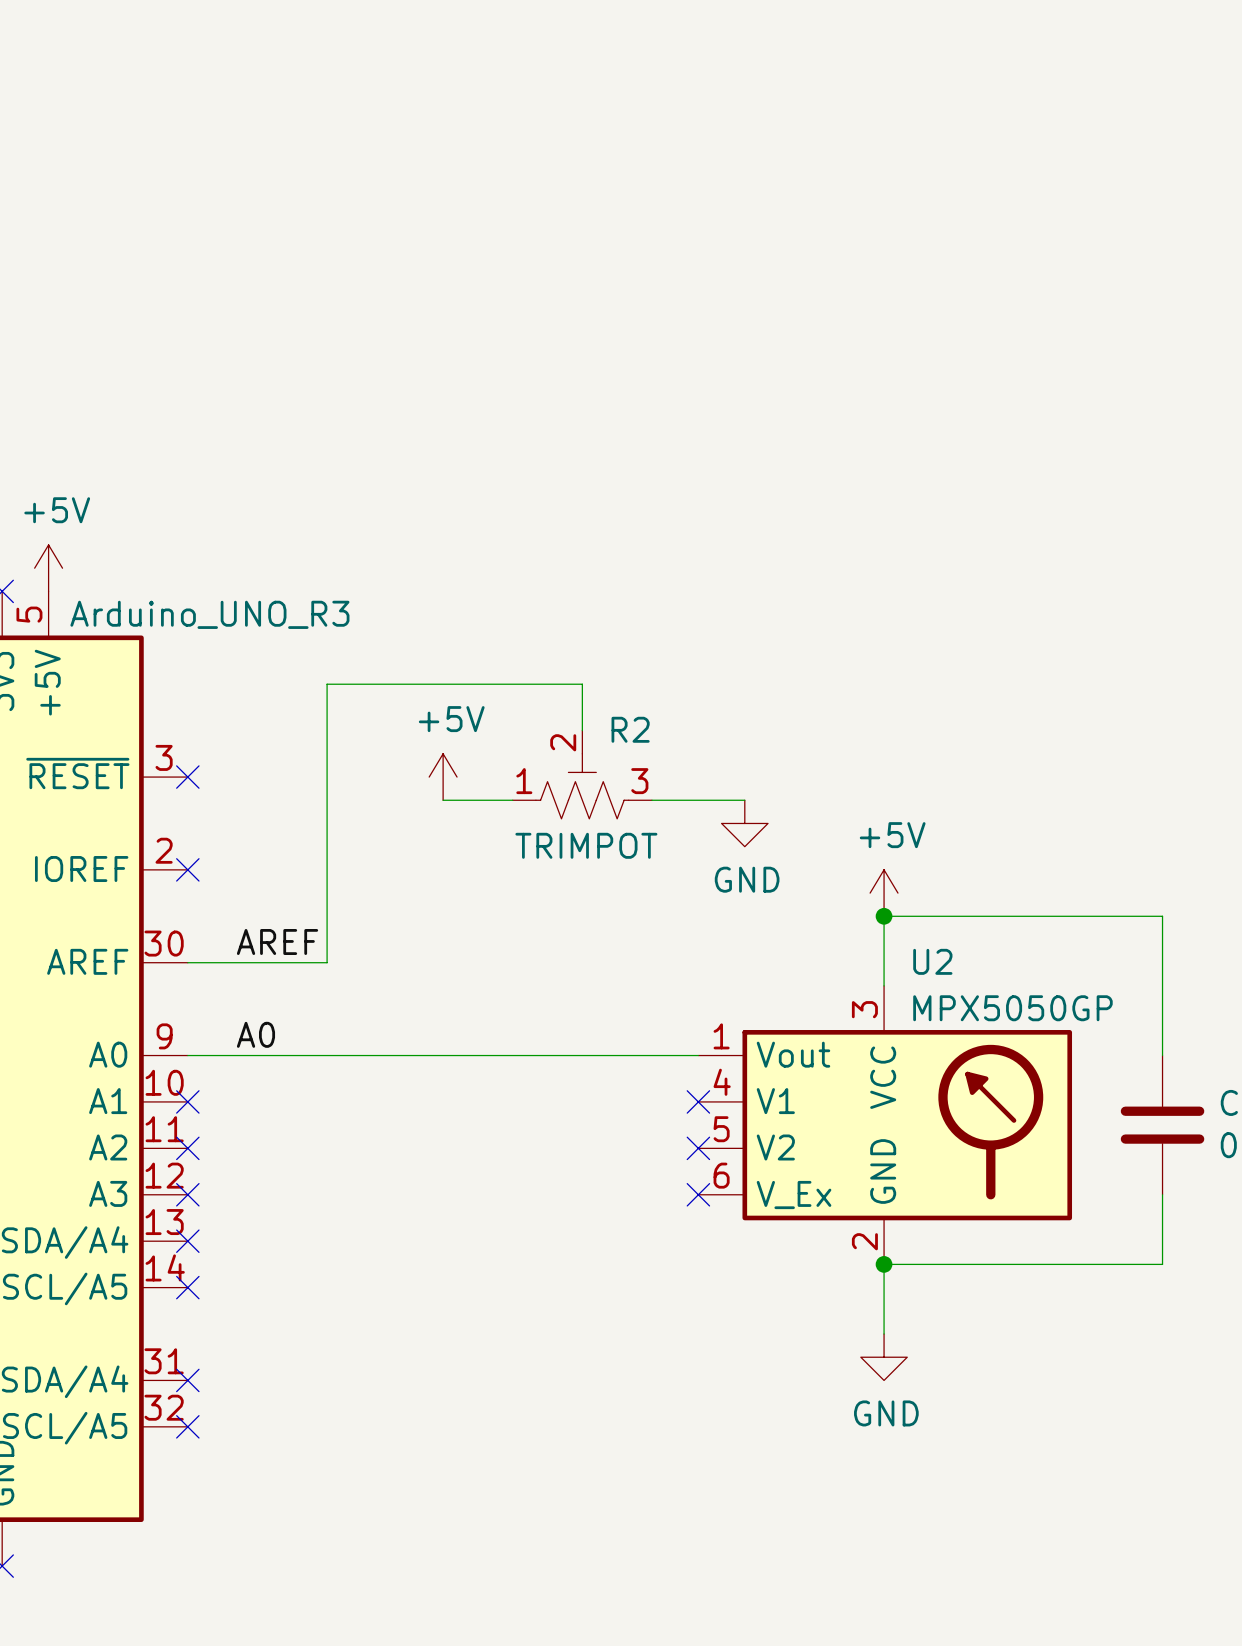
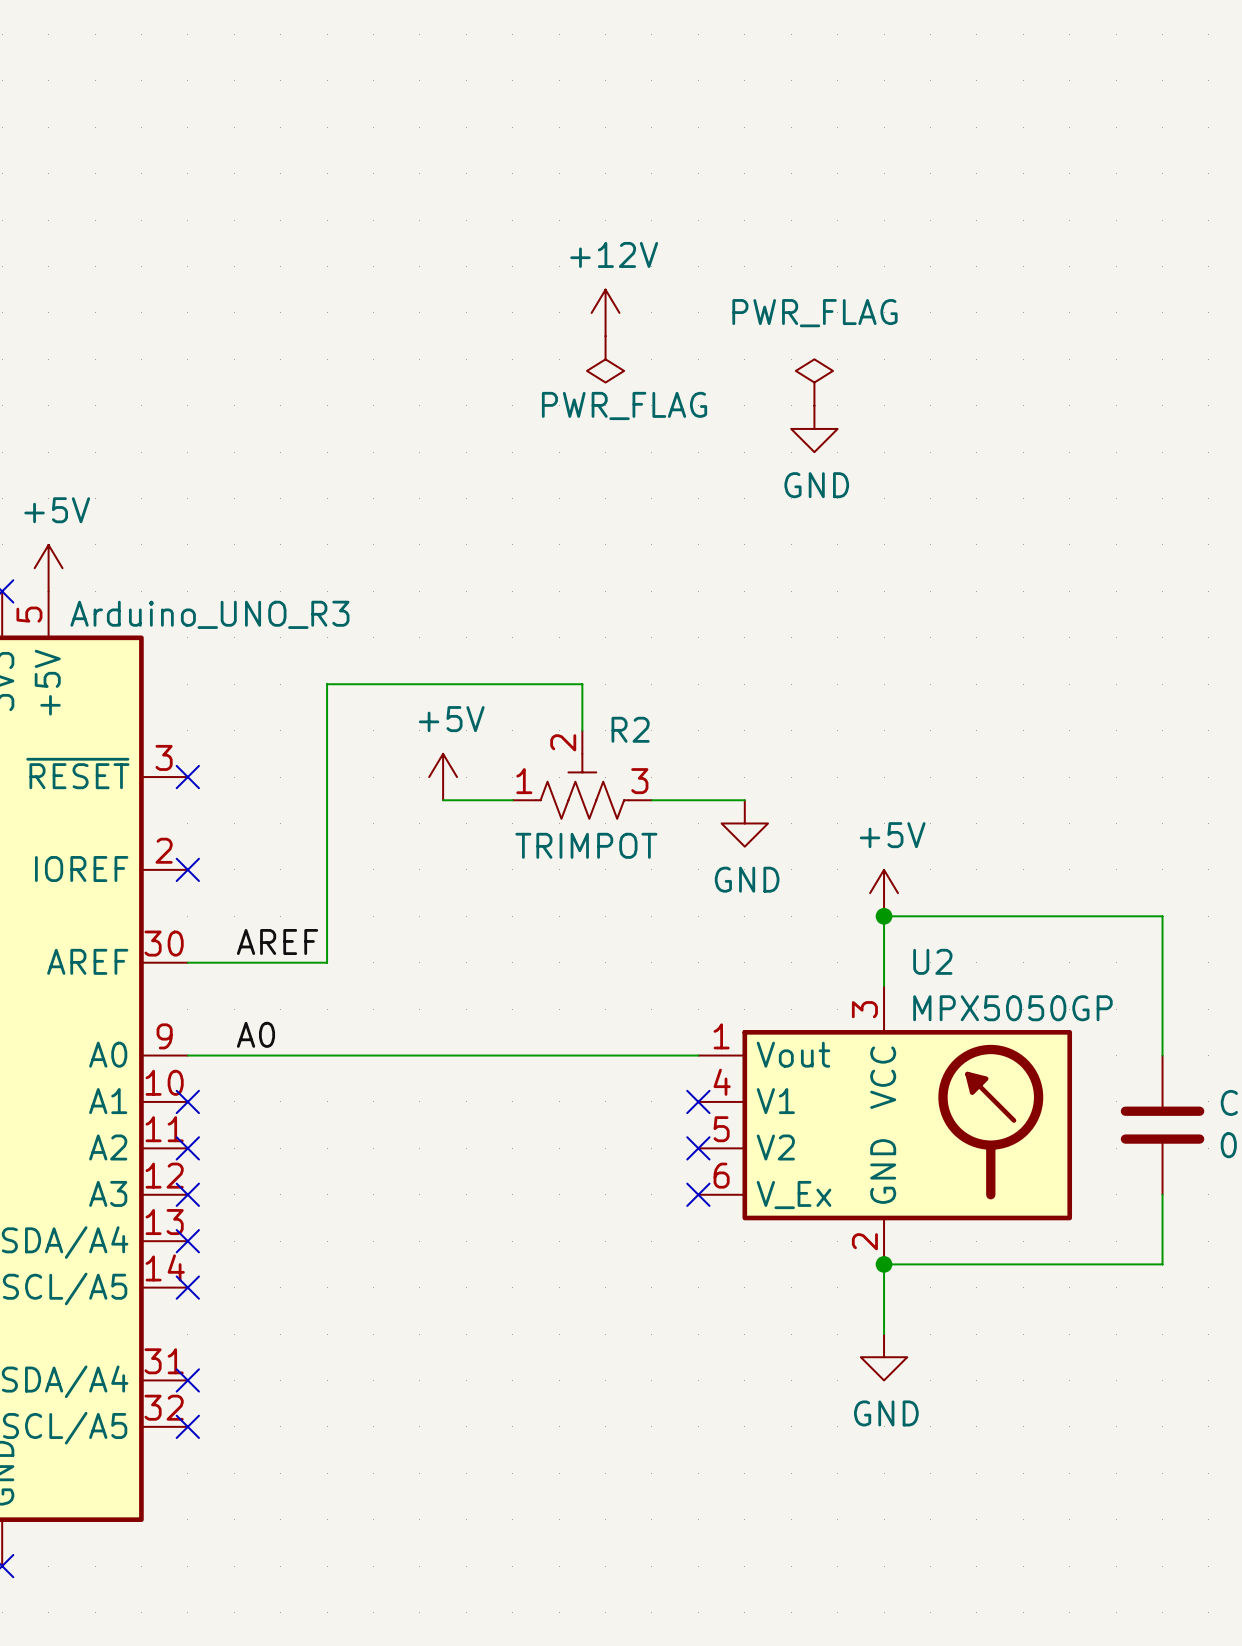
power symbol: none -> +12V (605, 312)
power symbol: none -> PWR_FLAG (605, 359)
power symbol: none -> PWR_FLAG (814, 382)
power symbol: none -> GND (814, 428)

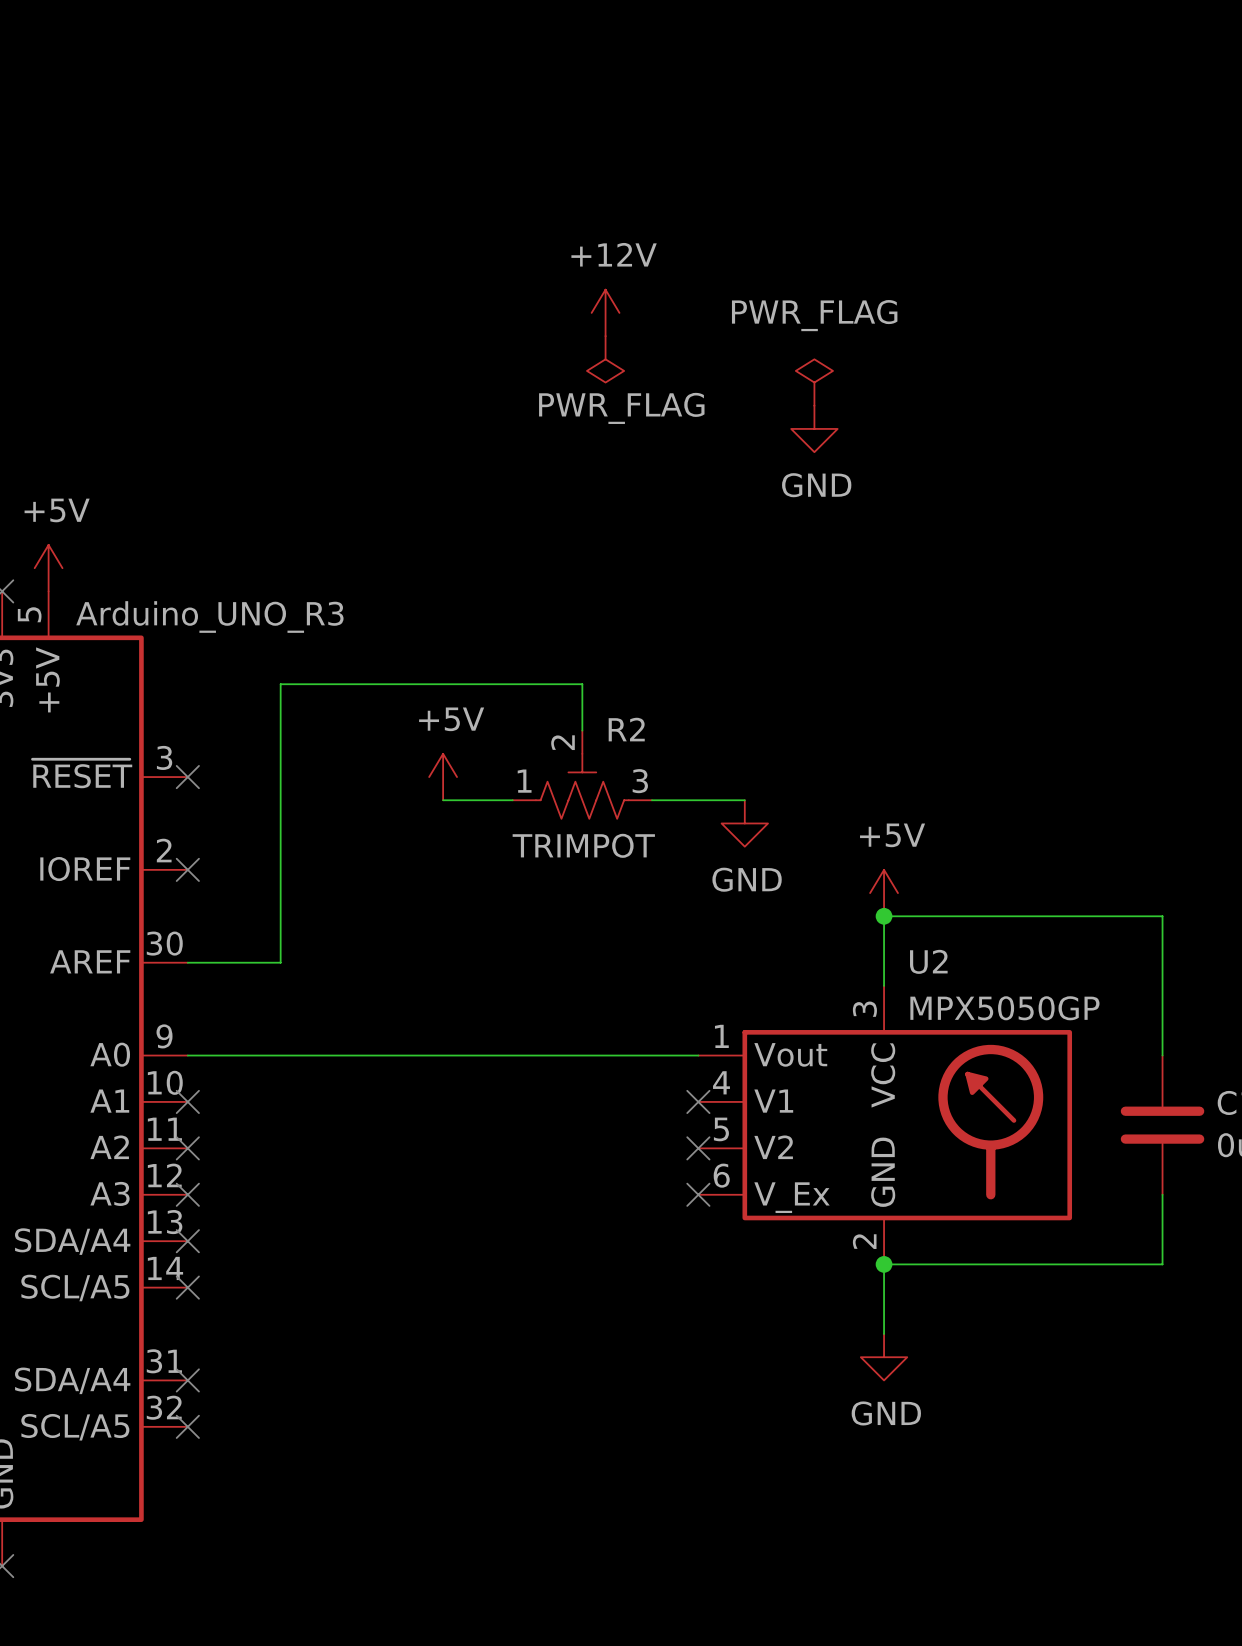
wire: (327, 684) (327, 962) (280, 962) -> (327, 684) (280, 684) (280, 962)
label: AREF (277, 942) -> none
label: A0 (255, 1034) -> none

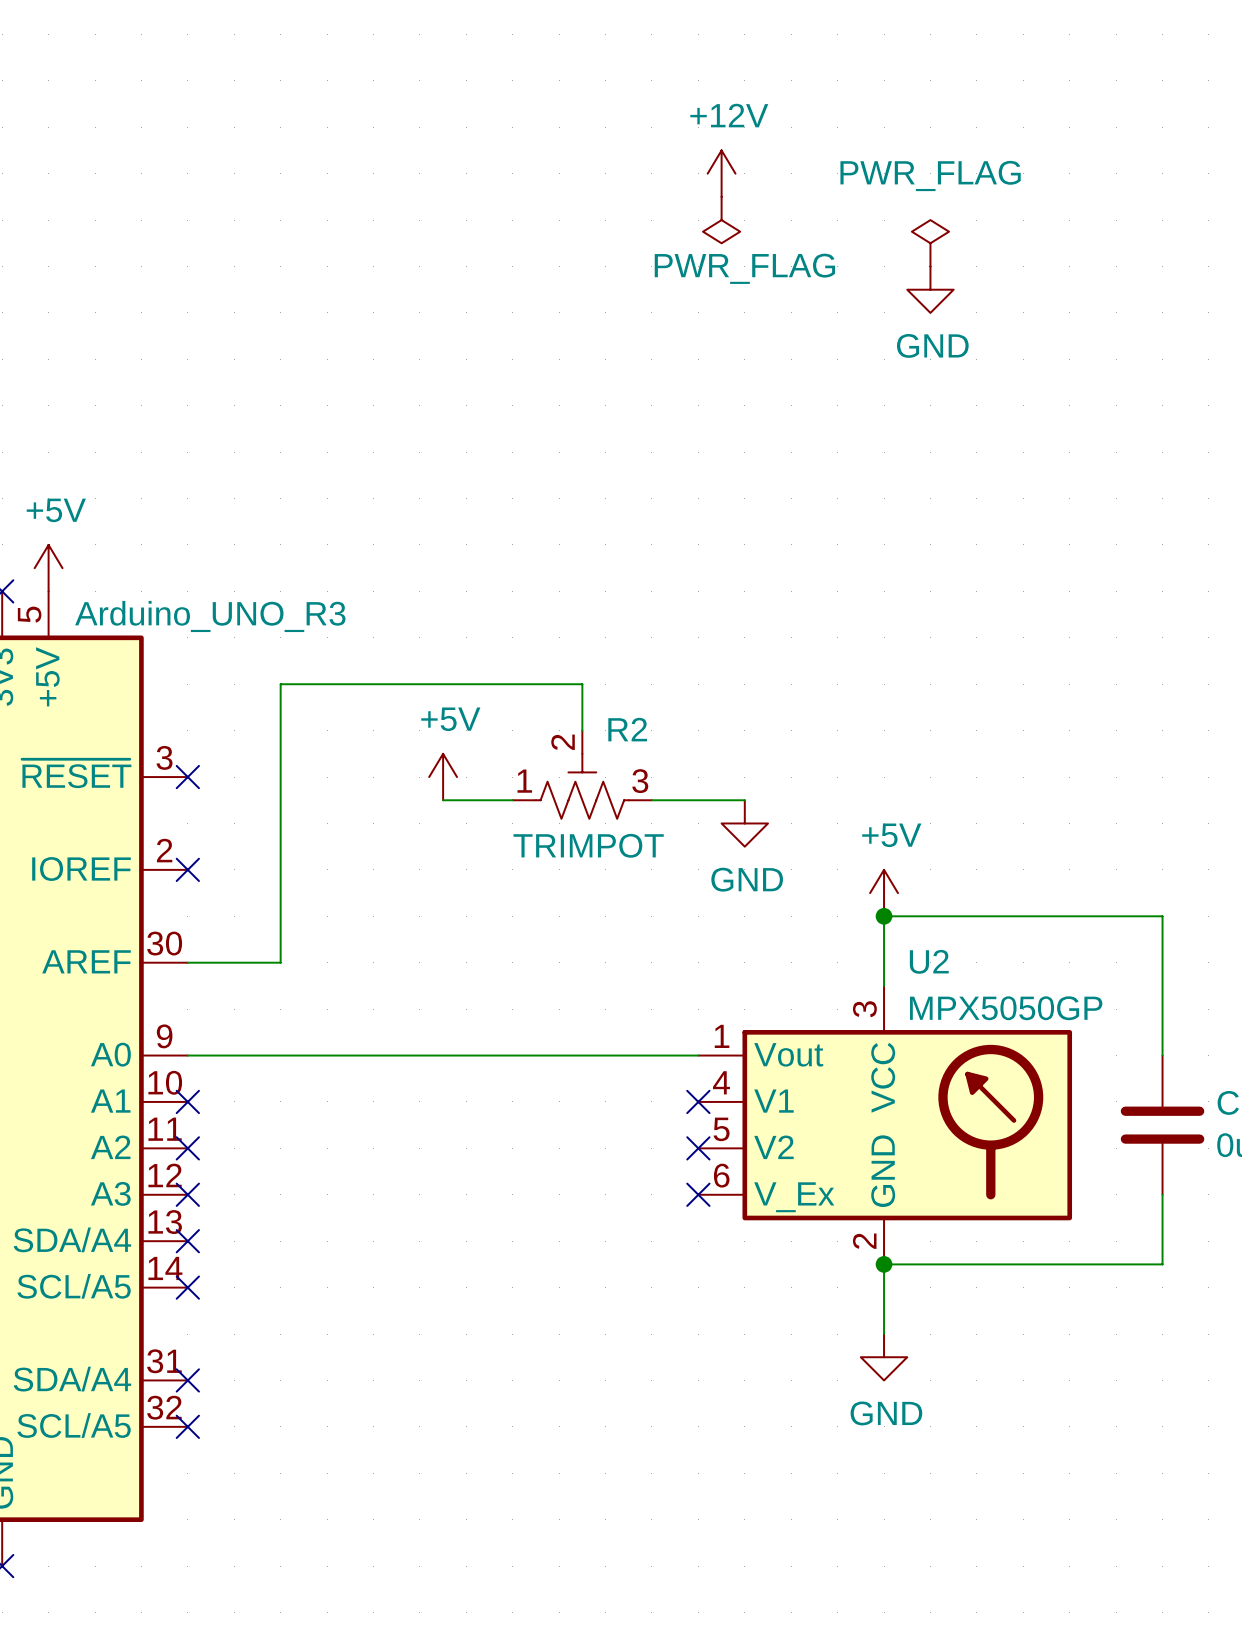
power symbol: none -> PWR_FLAG (721, 220)
power symbol: none -> PWR_FLAG (930, 243)
power symbol position: +12V (605, 312) -> +12V (721, 173)
power symbol: PWR_FLAG (605, 359) -> none
power symbol: PWR_FLAG (814, 382) -> none
power symbol position: GND (814, 428) -> GND (930, 289)

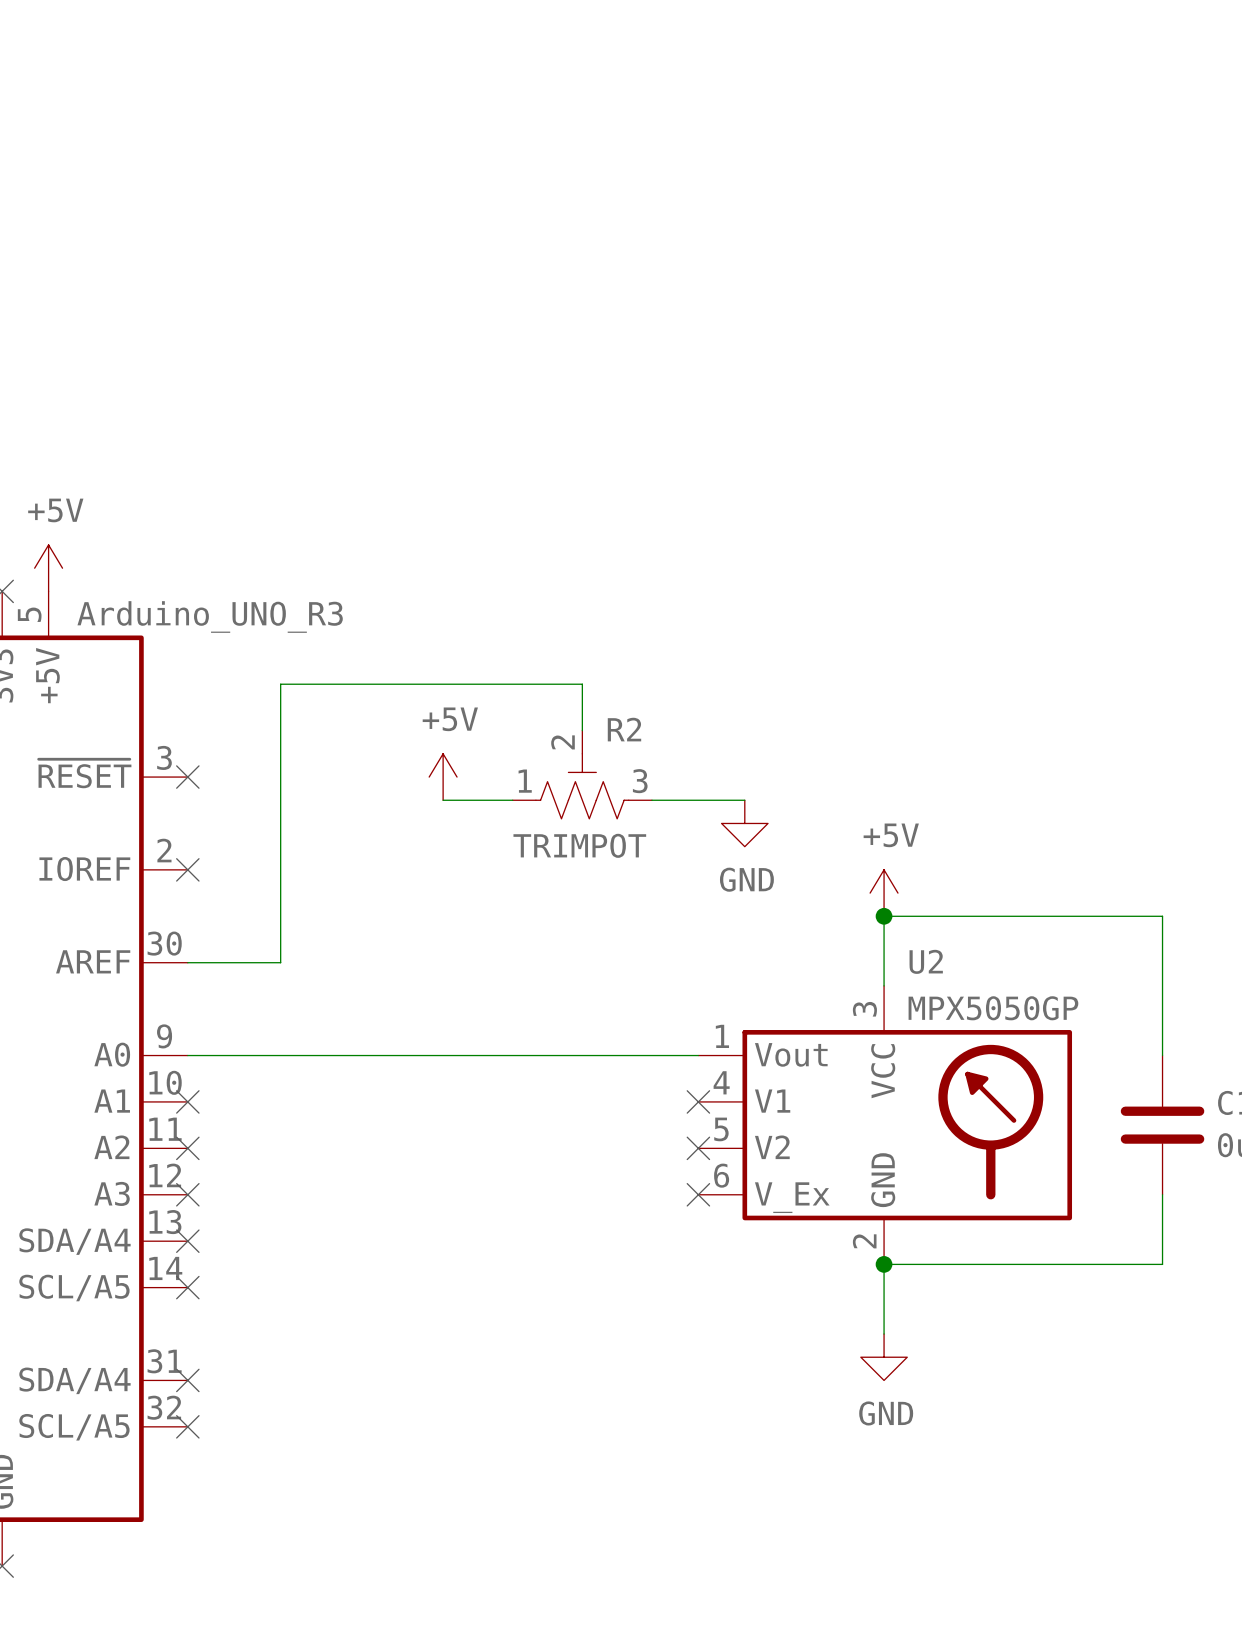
power symbol: +12V (721, 173) -> none
power symbol: PWR_FLAG (721, 220) -> none
power symbol: PWR_FLAG (930, 243) -> none
power symbol: GND (930, 289) -> none

